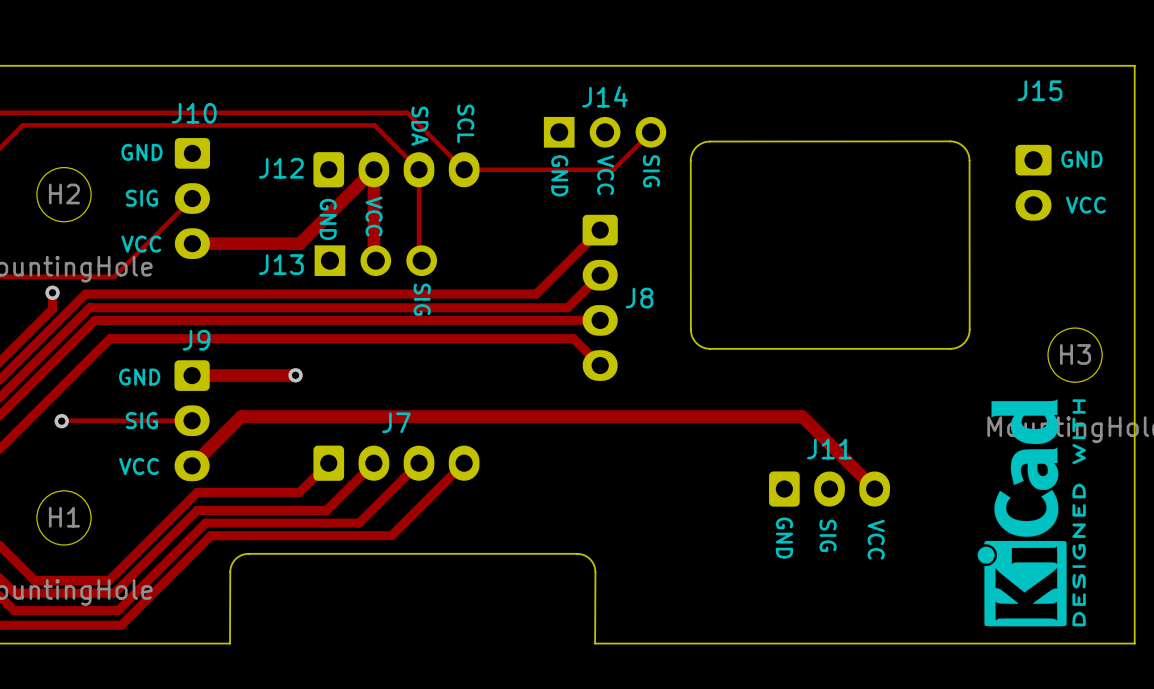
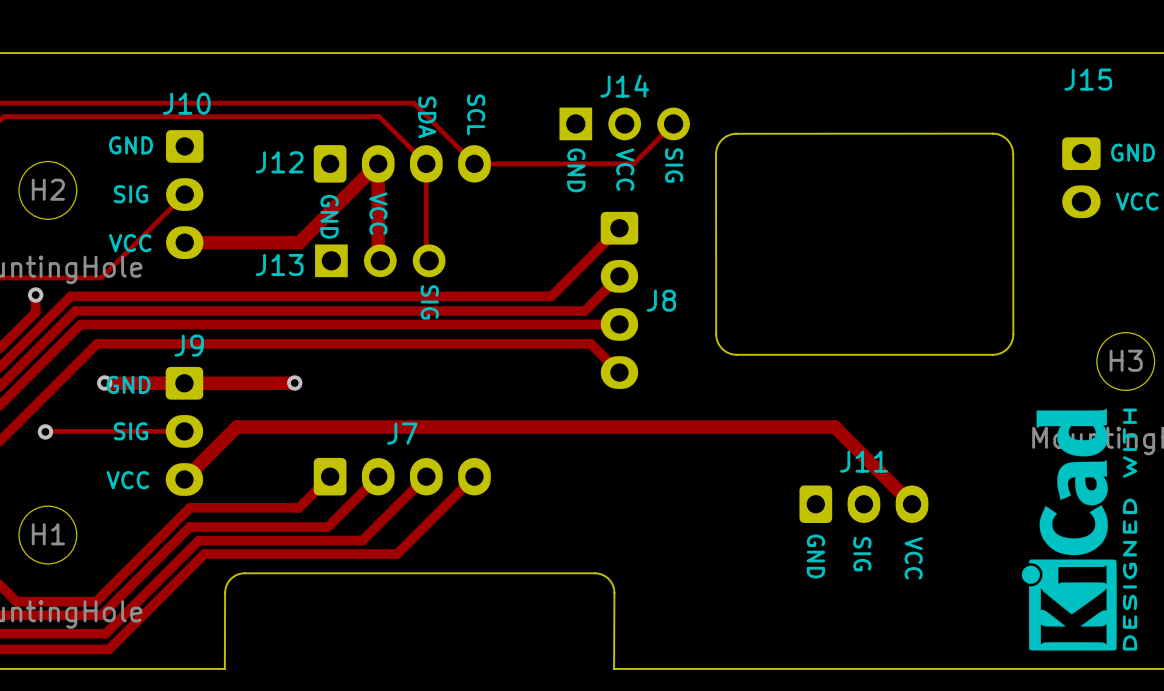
track: none -> (104, 383) (184, 383)
via: none -> (104, 383)

